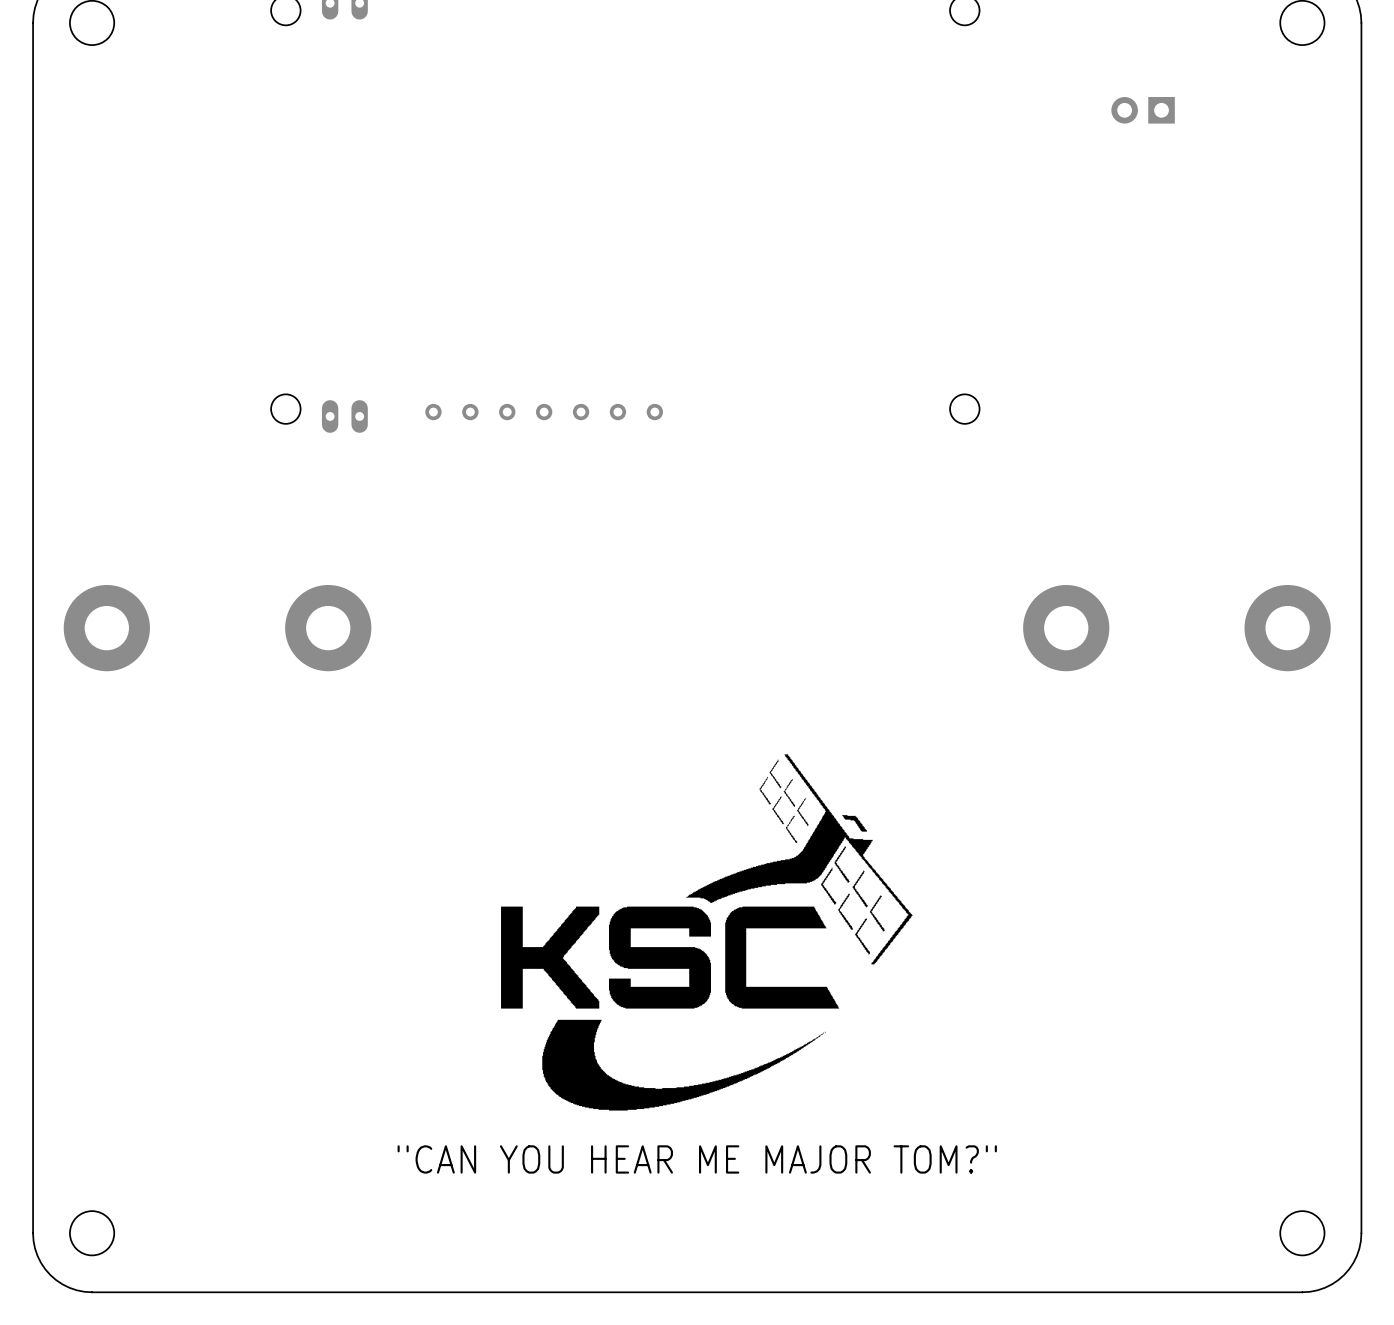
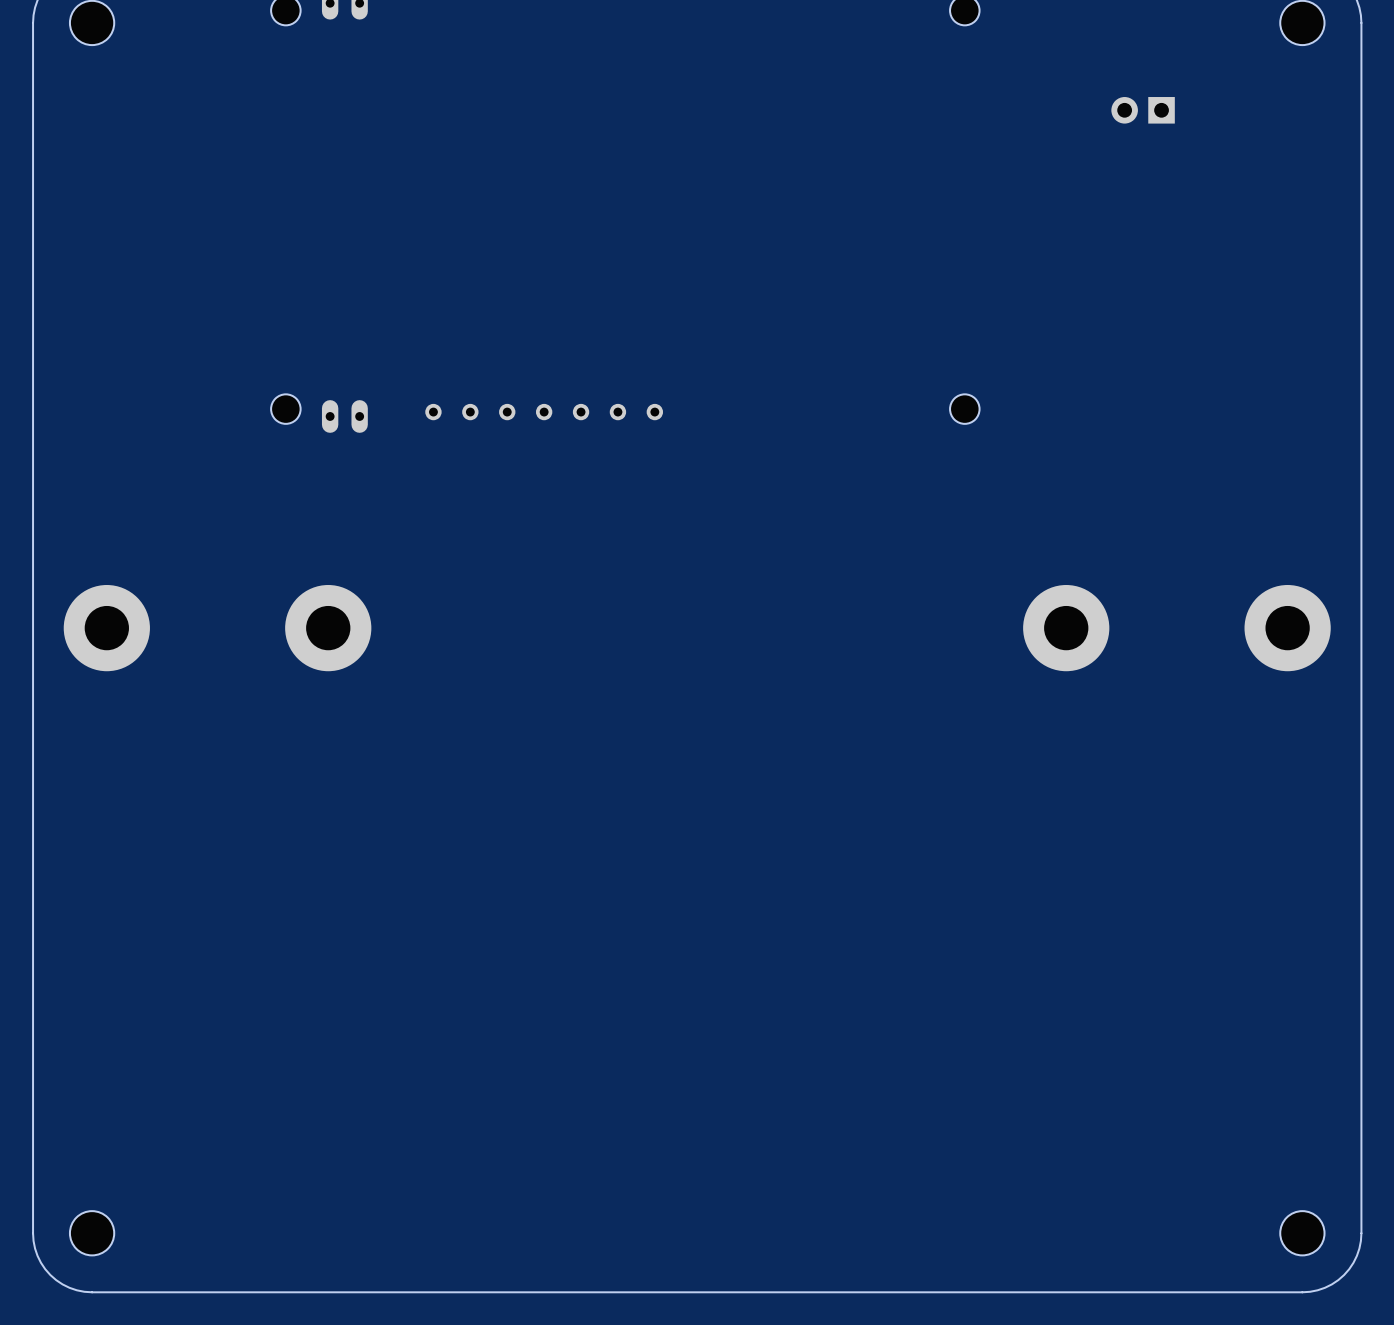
drawing: [501, 754, 913, 1111] -> none
text: "CAN YOU HEAR ME MAJOR TOM?" (697, 1159) -> none

